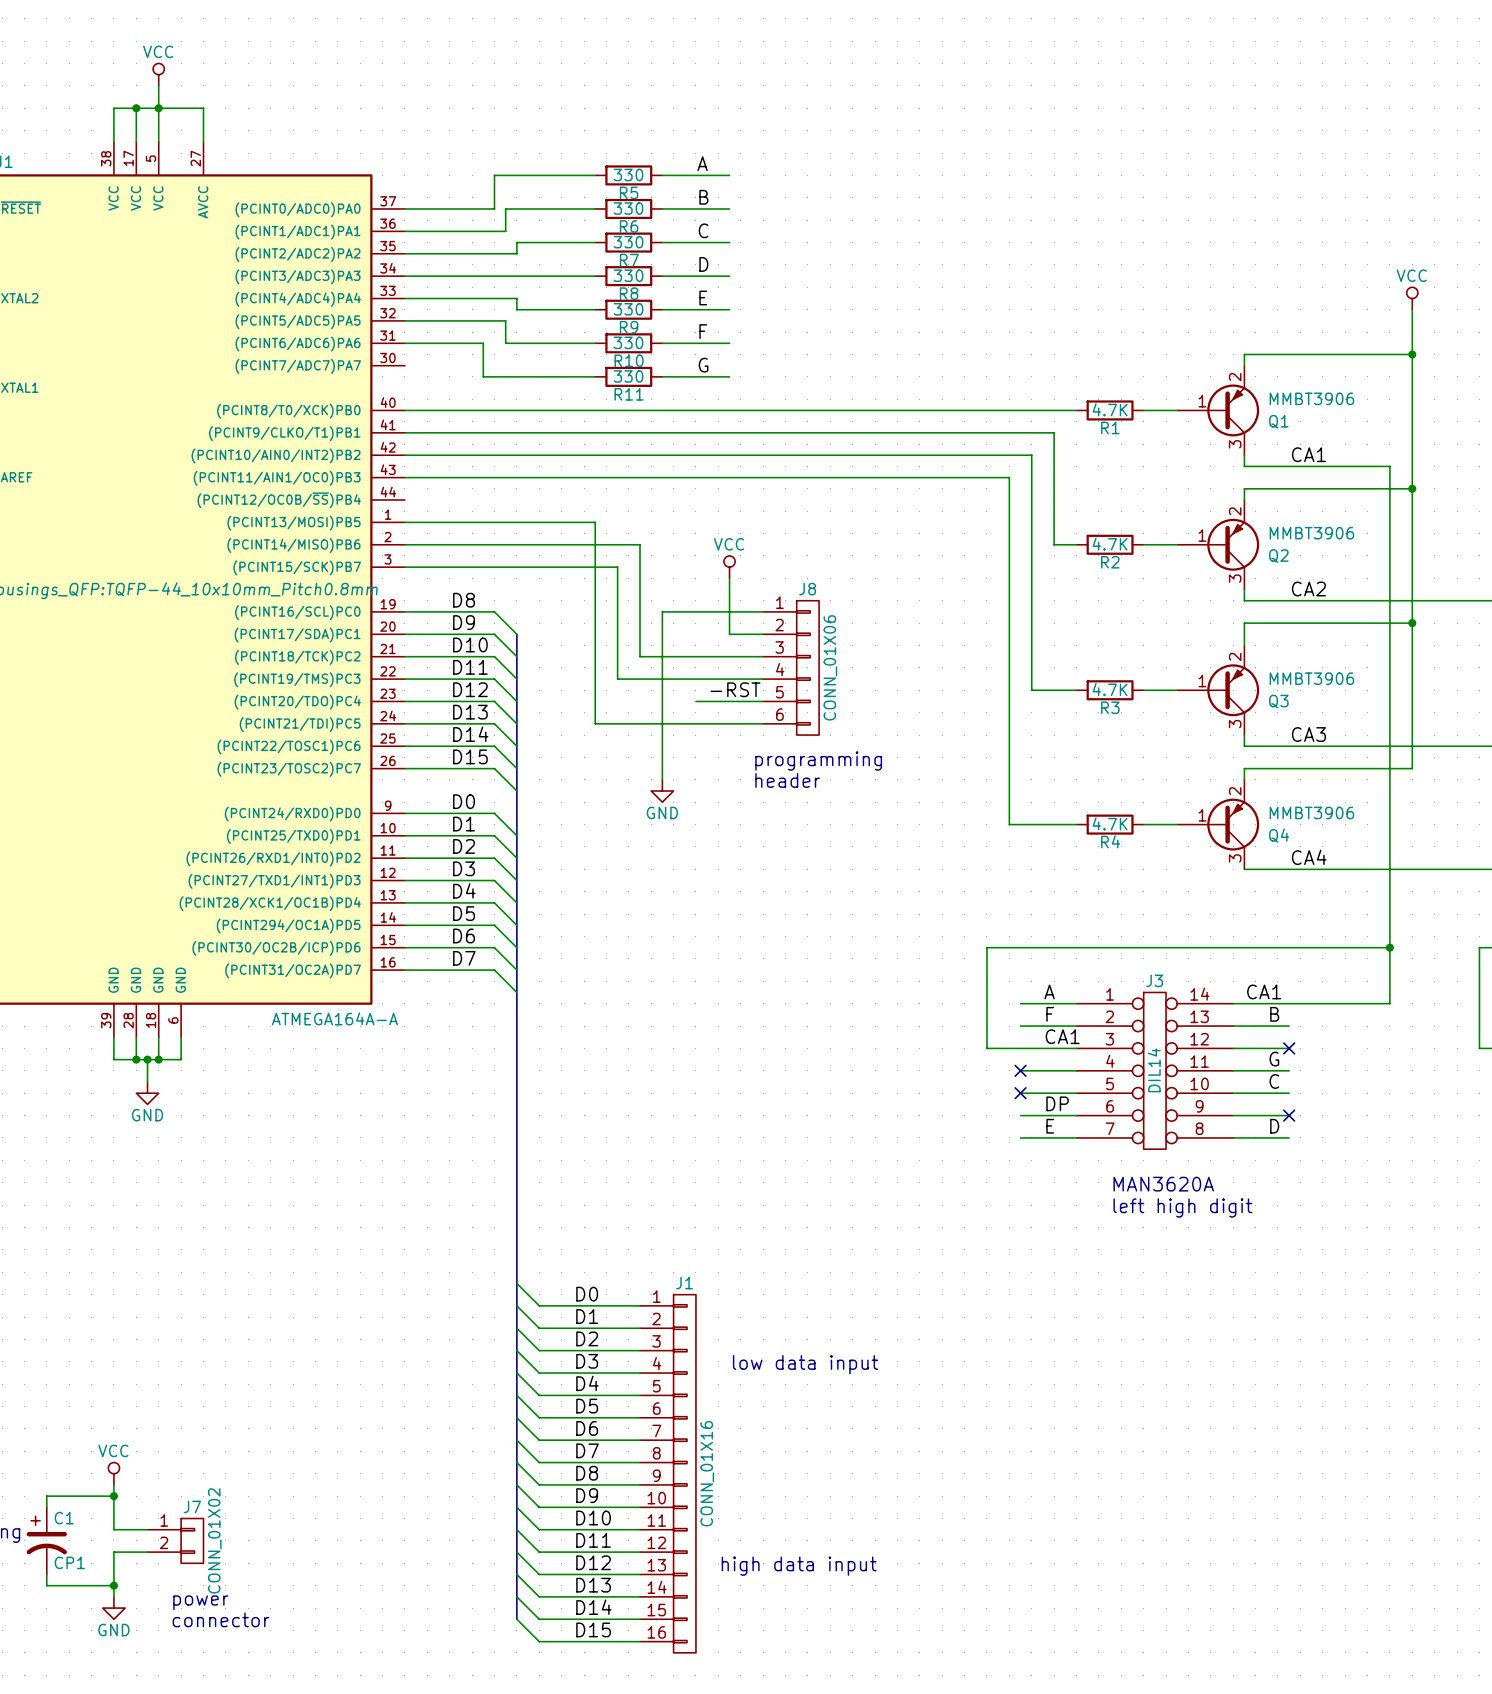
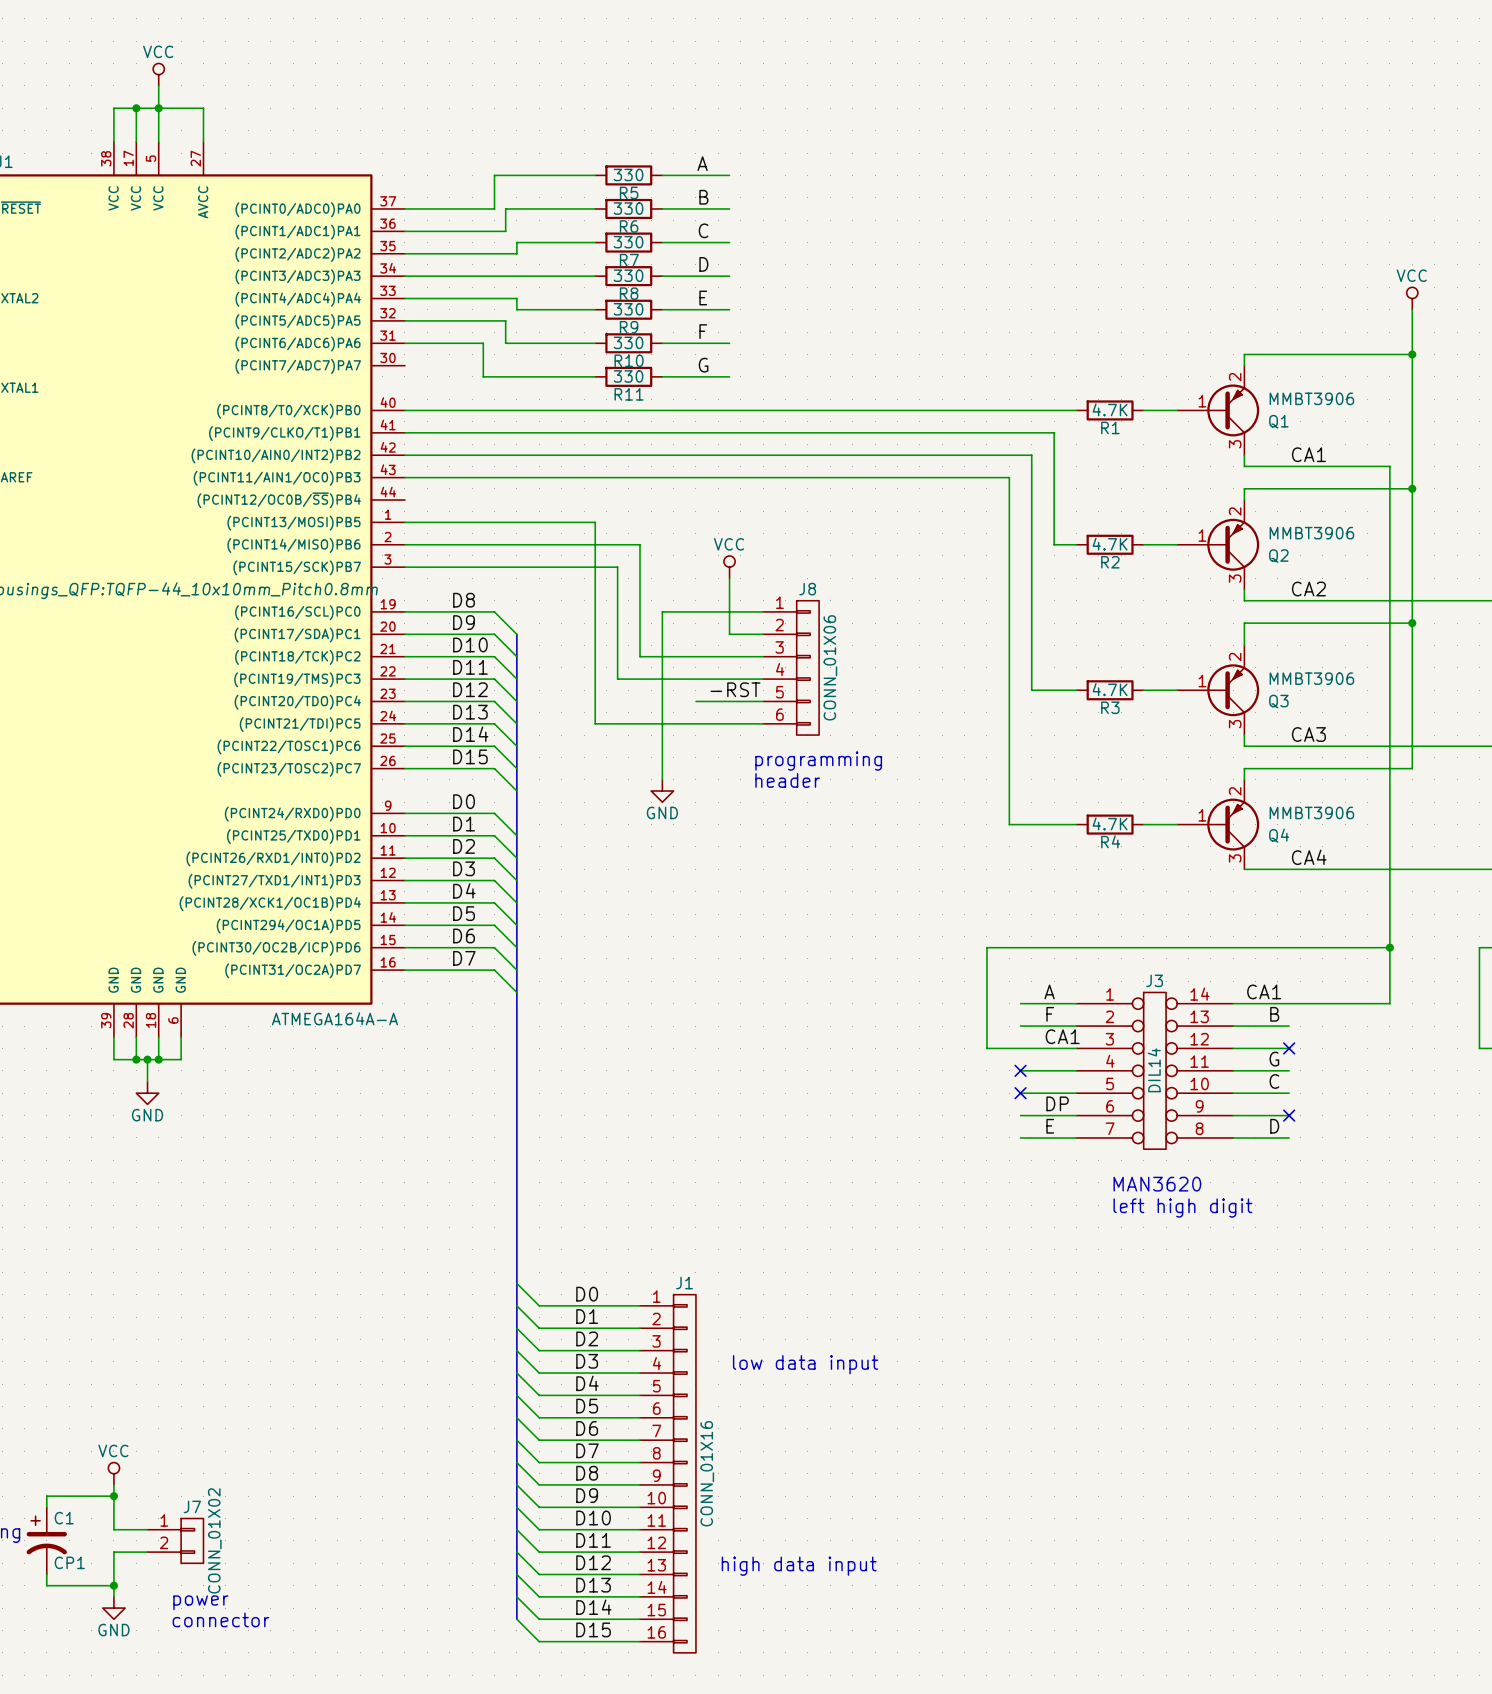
text: MAN3620A (1163, 1184) -> MAN3620 (1157, 1184)

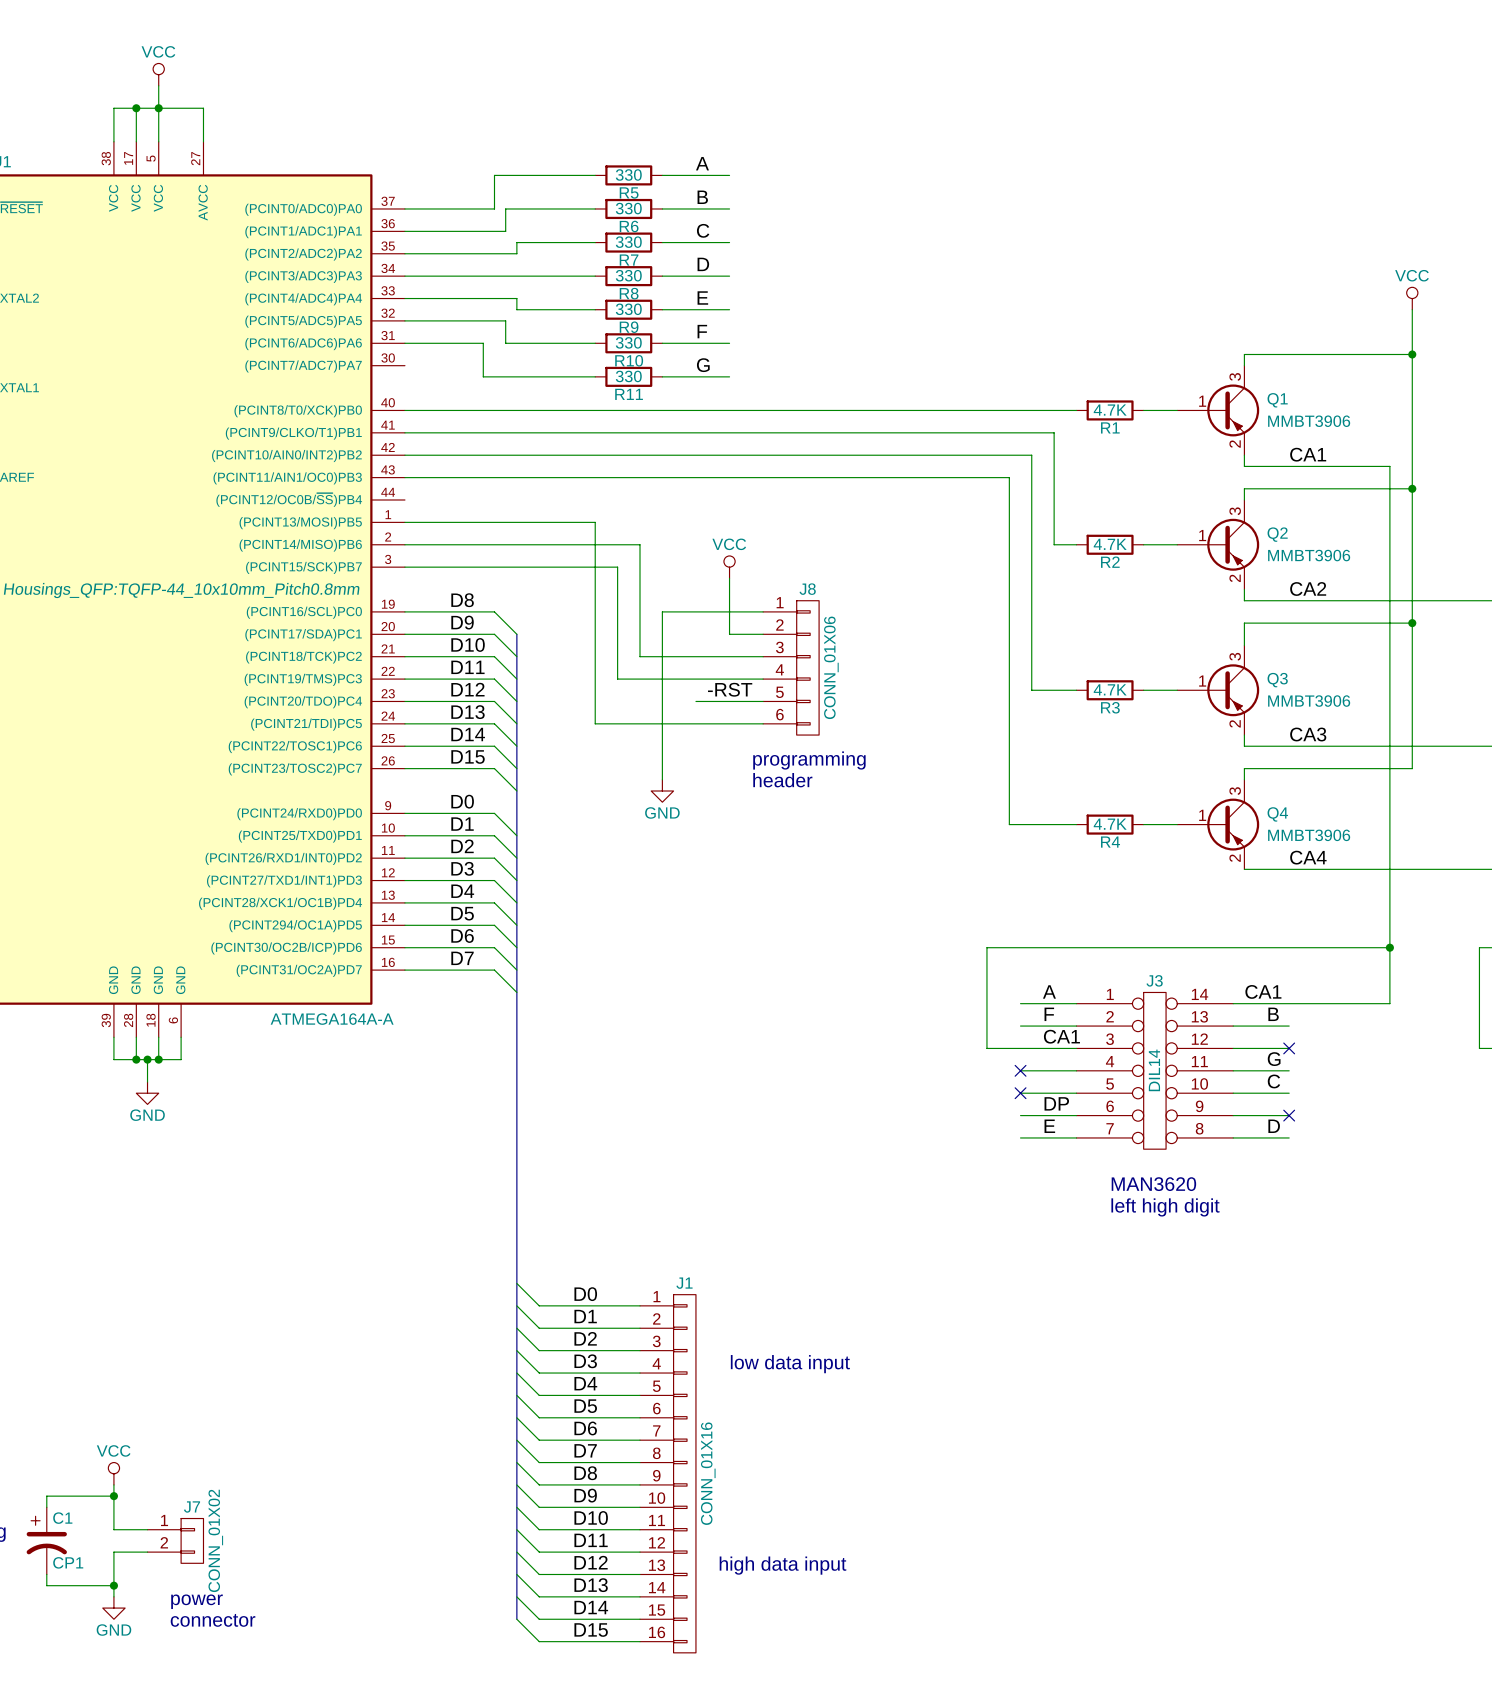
Q1 flip: as is (1233, 410) -> up-down (1233, 410)
Q2 flip: as is (1233, 544) -> up-down (1233, 544)
Q3 flip: as is (1233, 690) -> up-down (1233, 690)
Q4 flip: as is (1233, 824) -> up-down (1233, 824)

